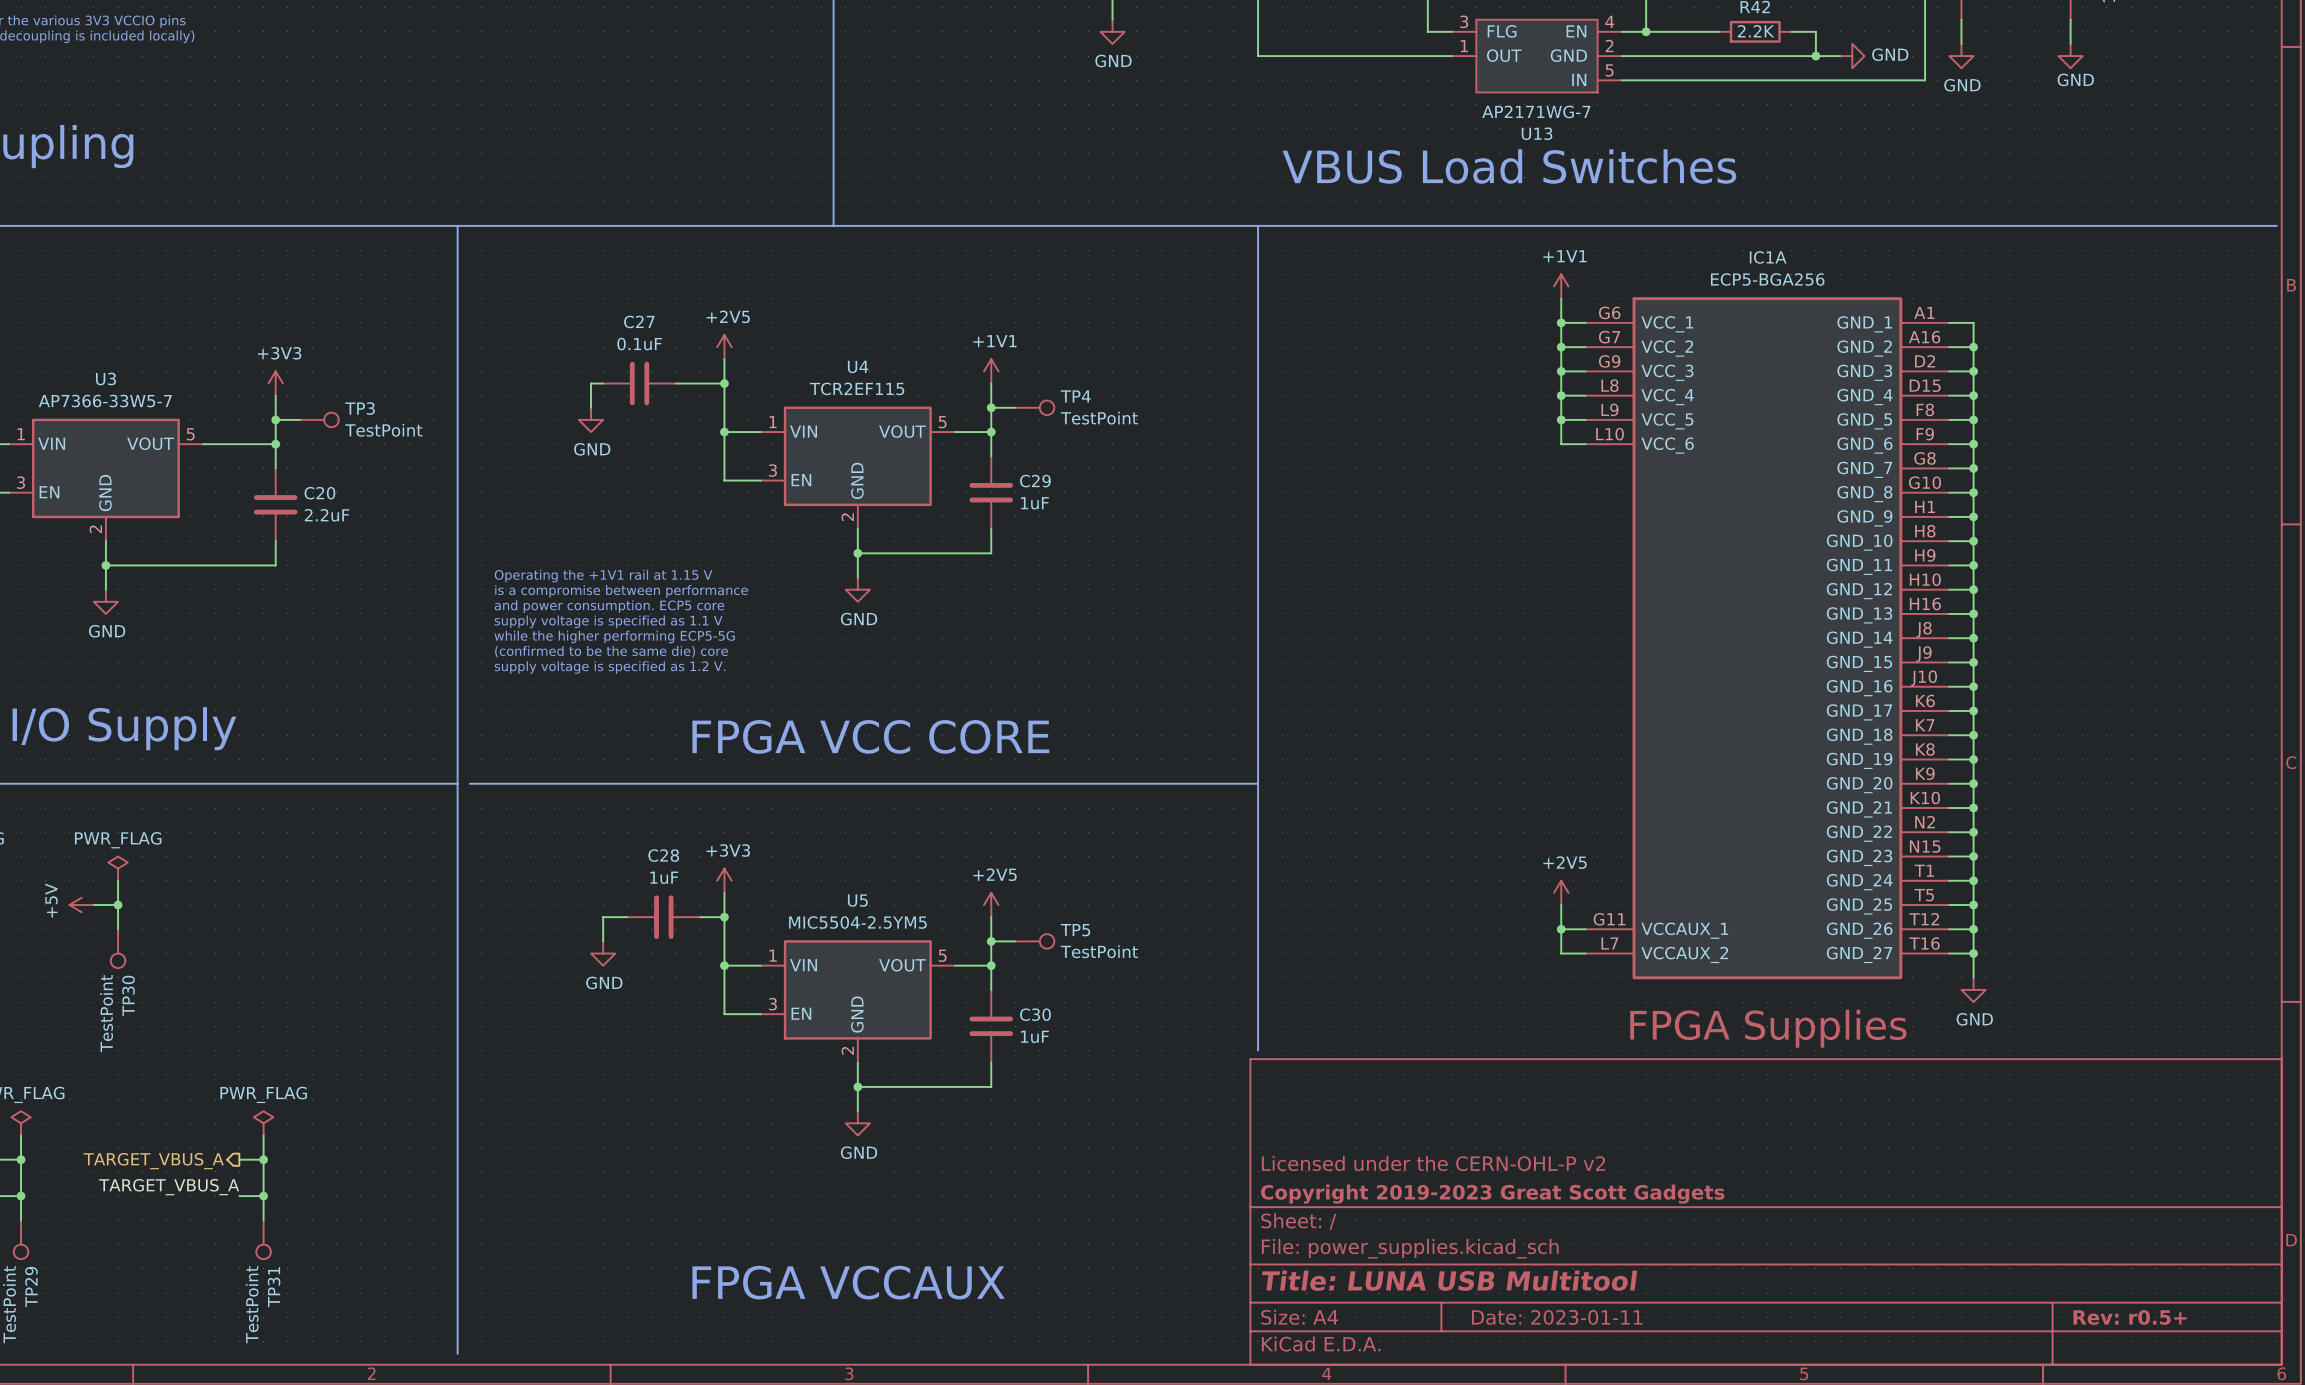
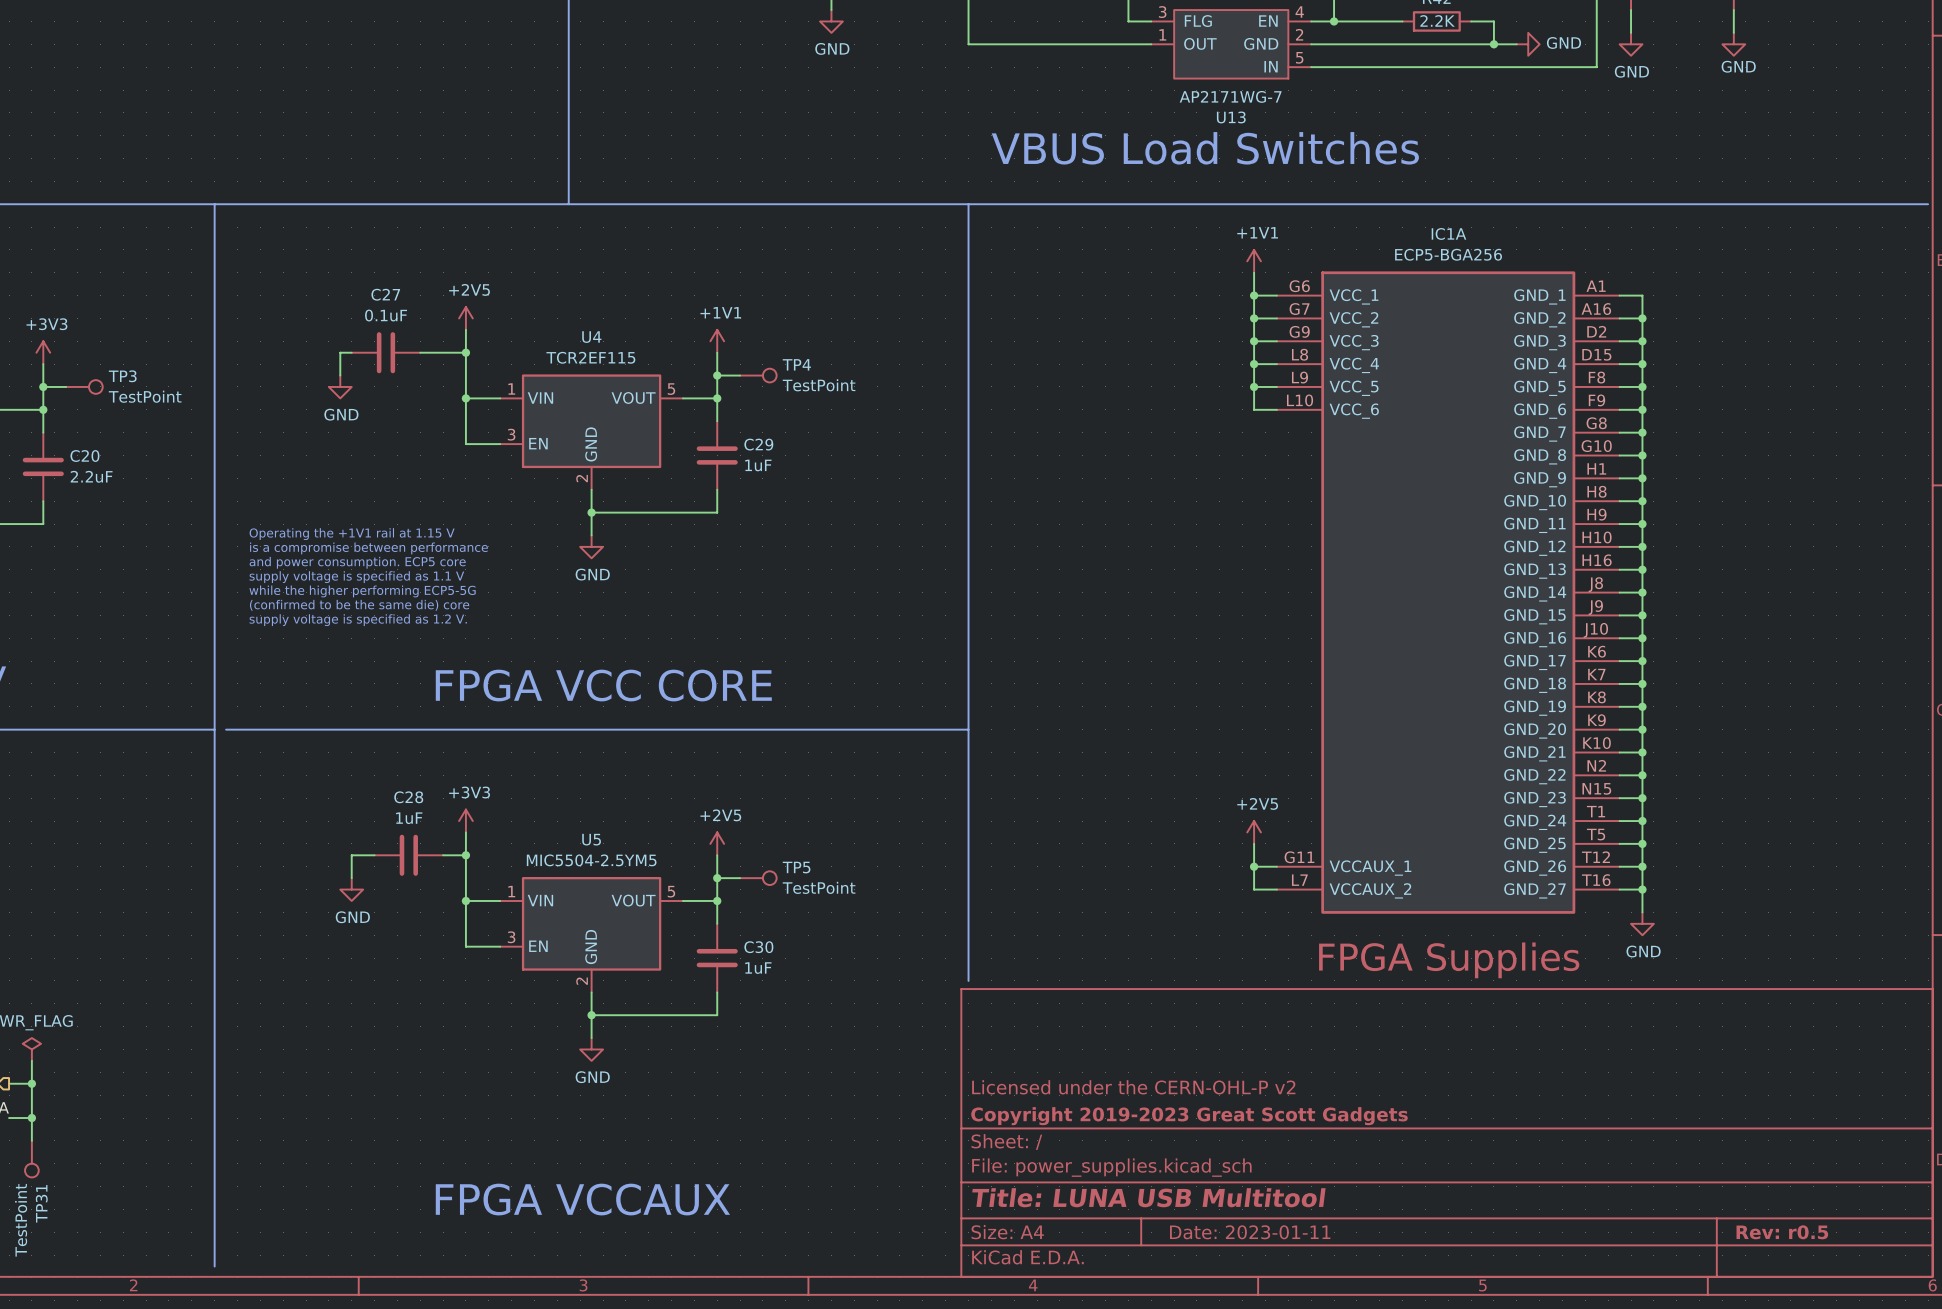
title block: Rev: r0.5+ (2129, 1317) -> Rev: r0.5 (1782, 1232)

